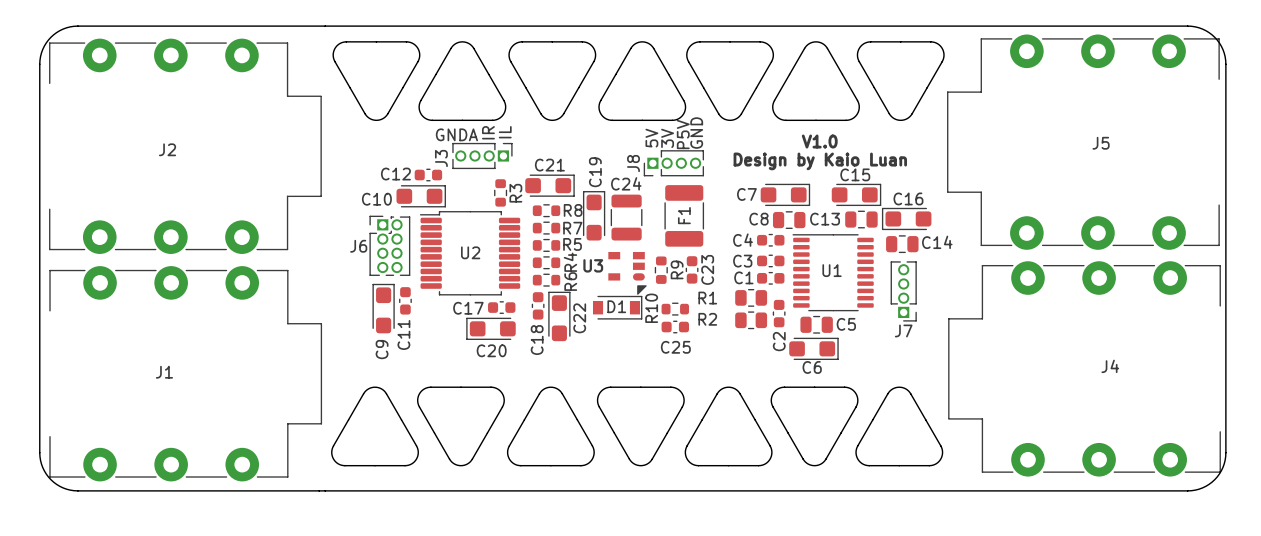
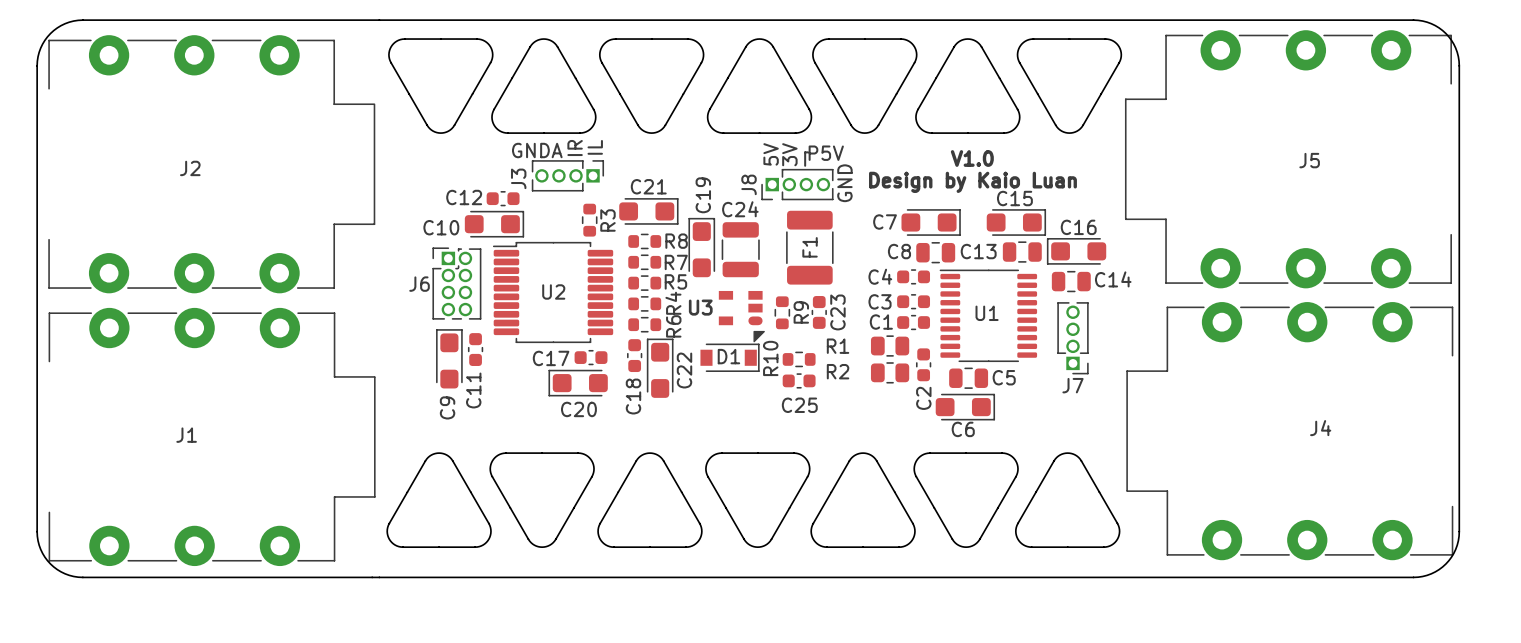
text position: GND (696, 133) -> GND (844, 183)
text rotation: 0° (683, 134) -> 90° clockwise (826, 153)
line: none -> (807, 152) (805, 152) (805, 165)

